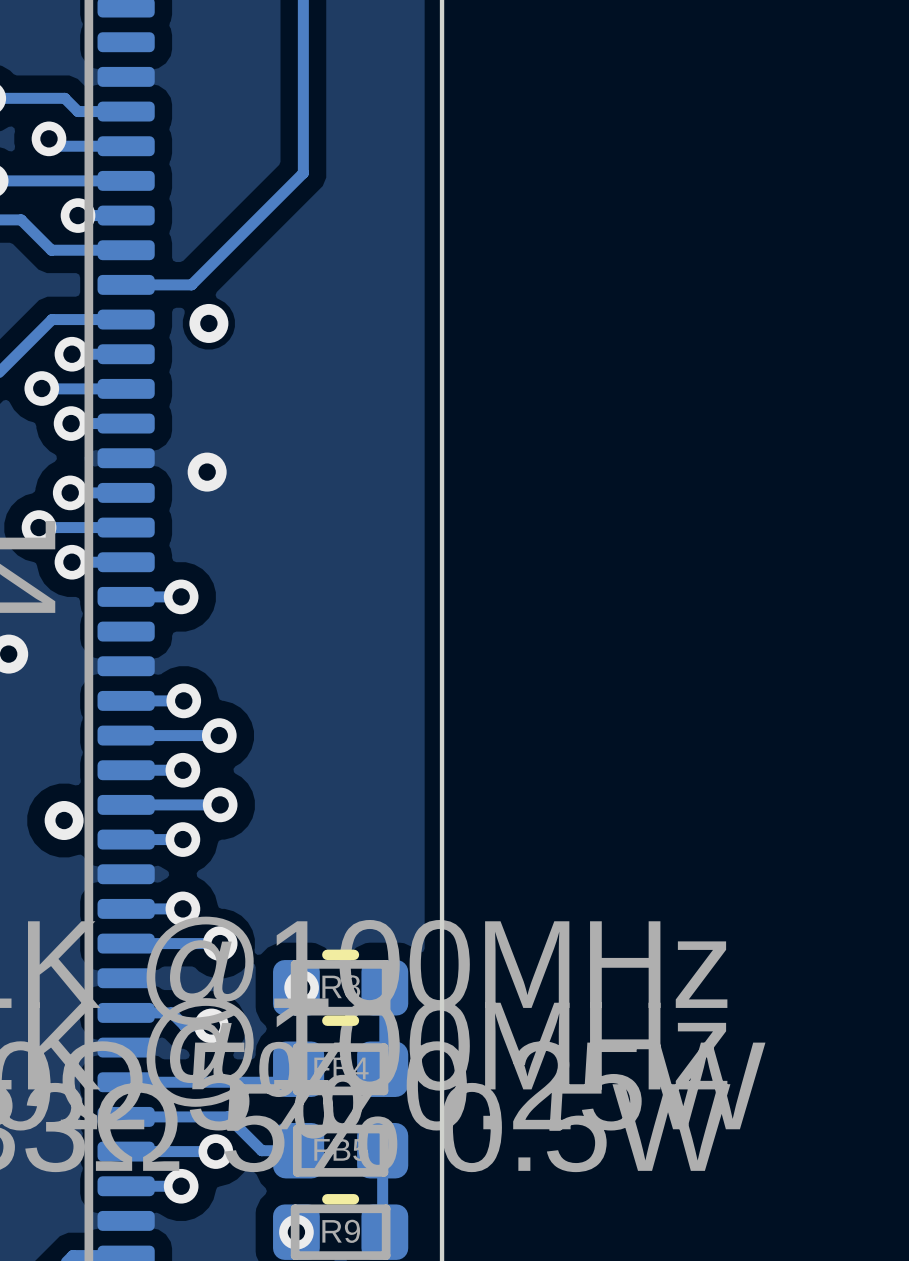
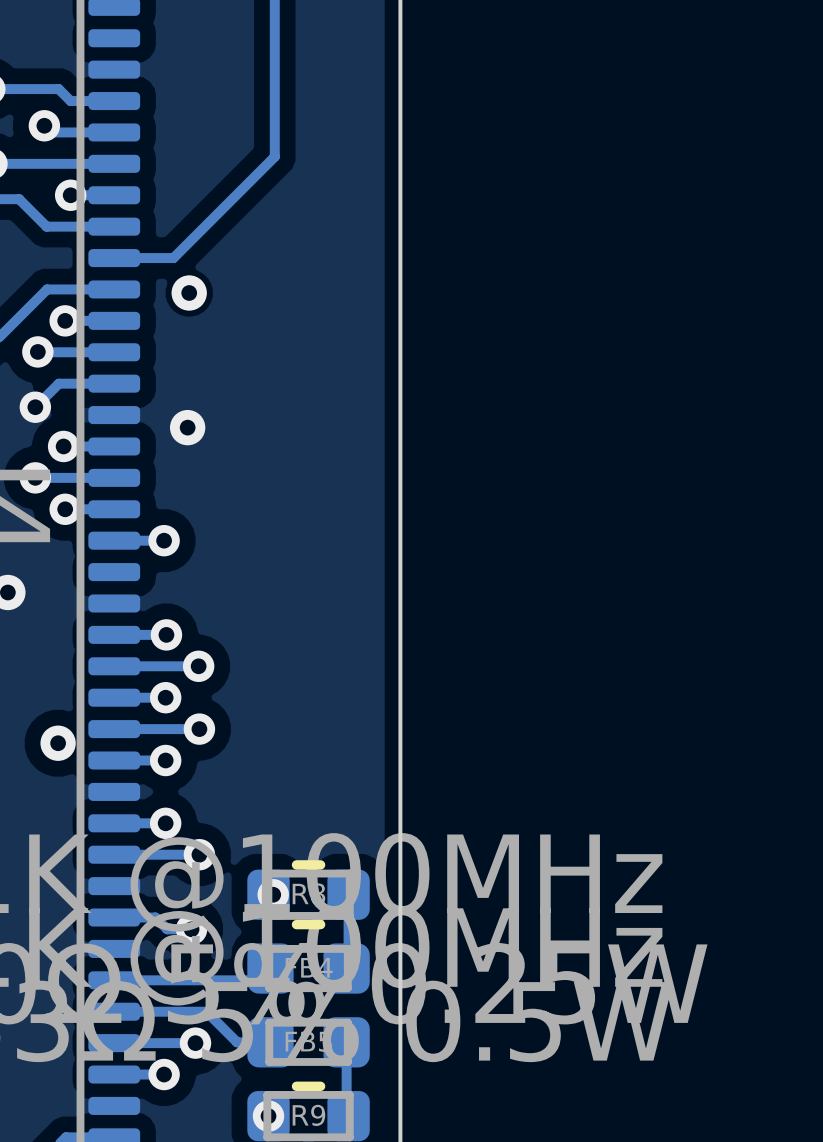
track: none -> (64, 383) (58, 383) (35, 407)
via position: (71, 423) -> (35, 407)

